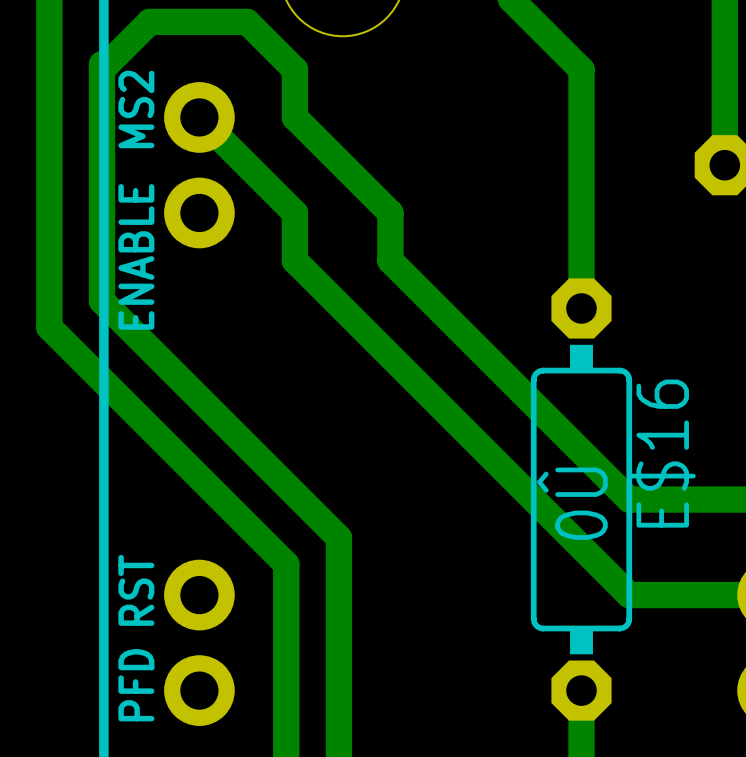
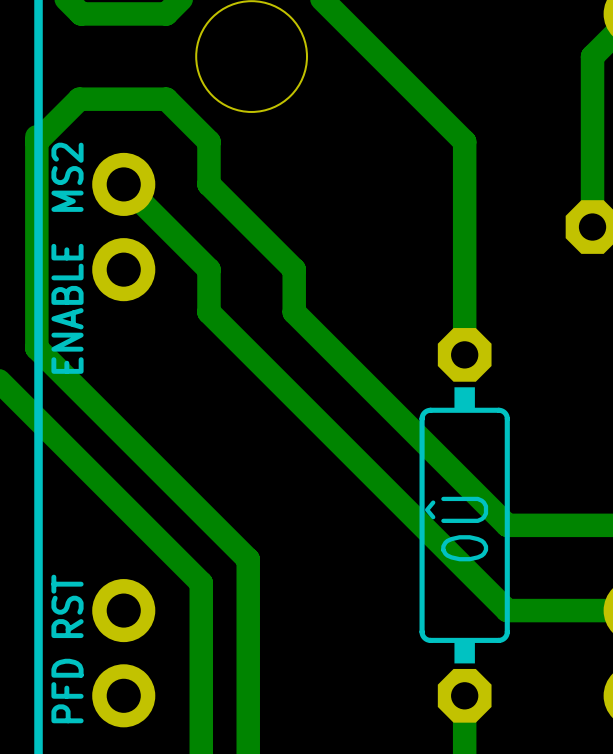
E$16 name: E$16 (662, 453) -> none

